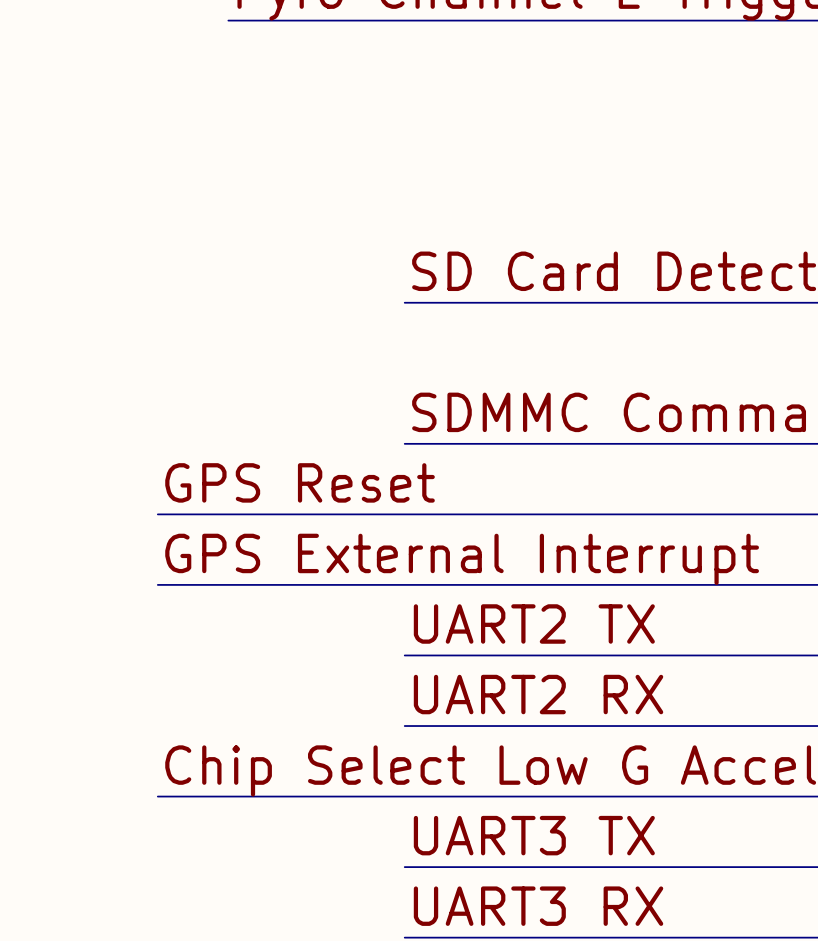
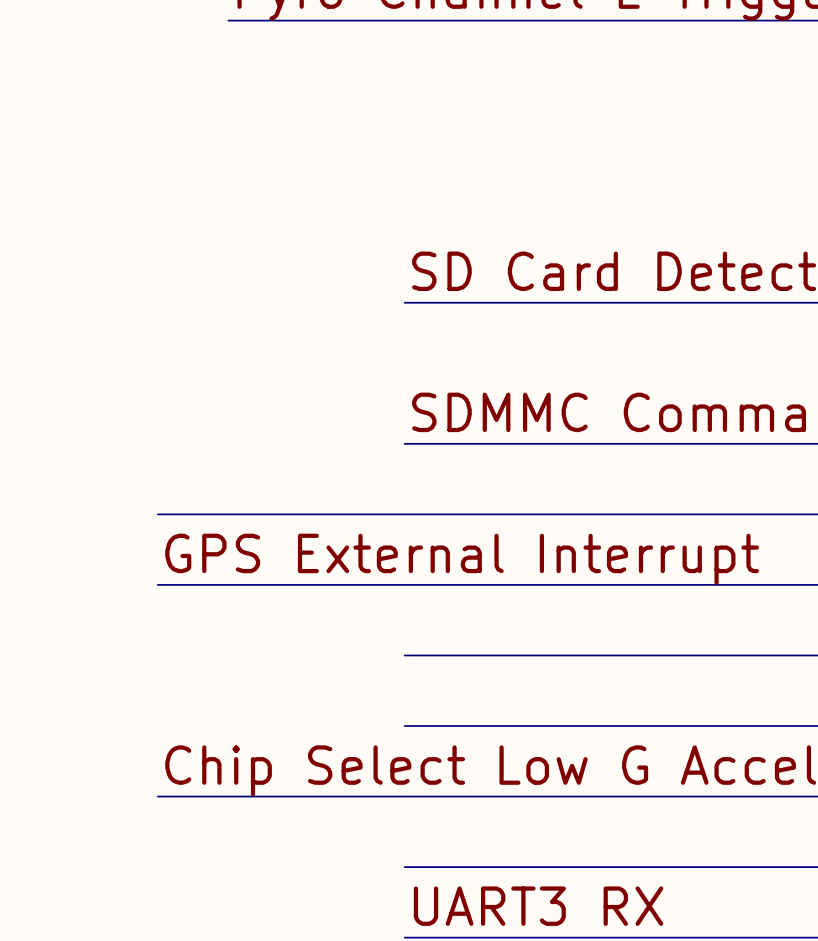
label: GPS Reset (300, 482) -> none
label: UART2 TX (534, 623) -> none
label: UART2 RX (538, 694) -> none
label: UART3 TX (534, 835) -> none

